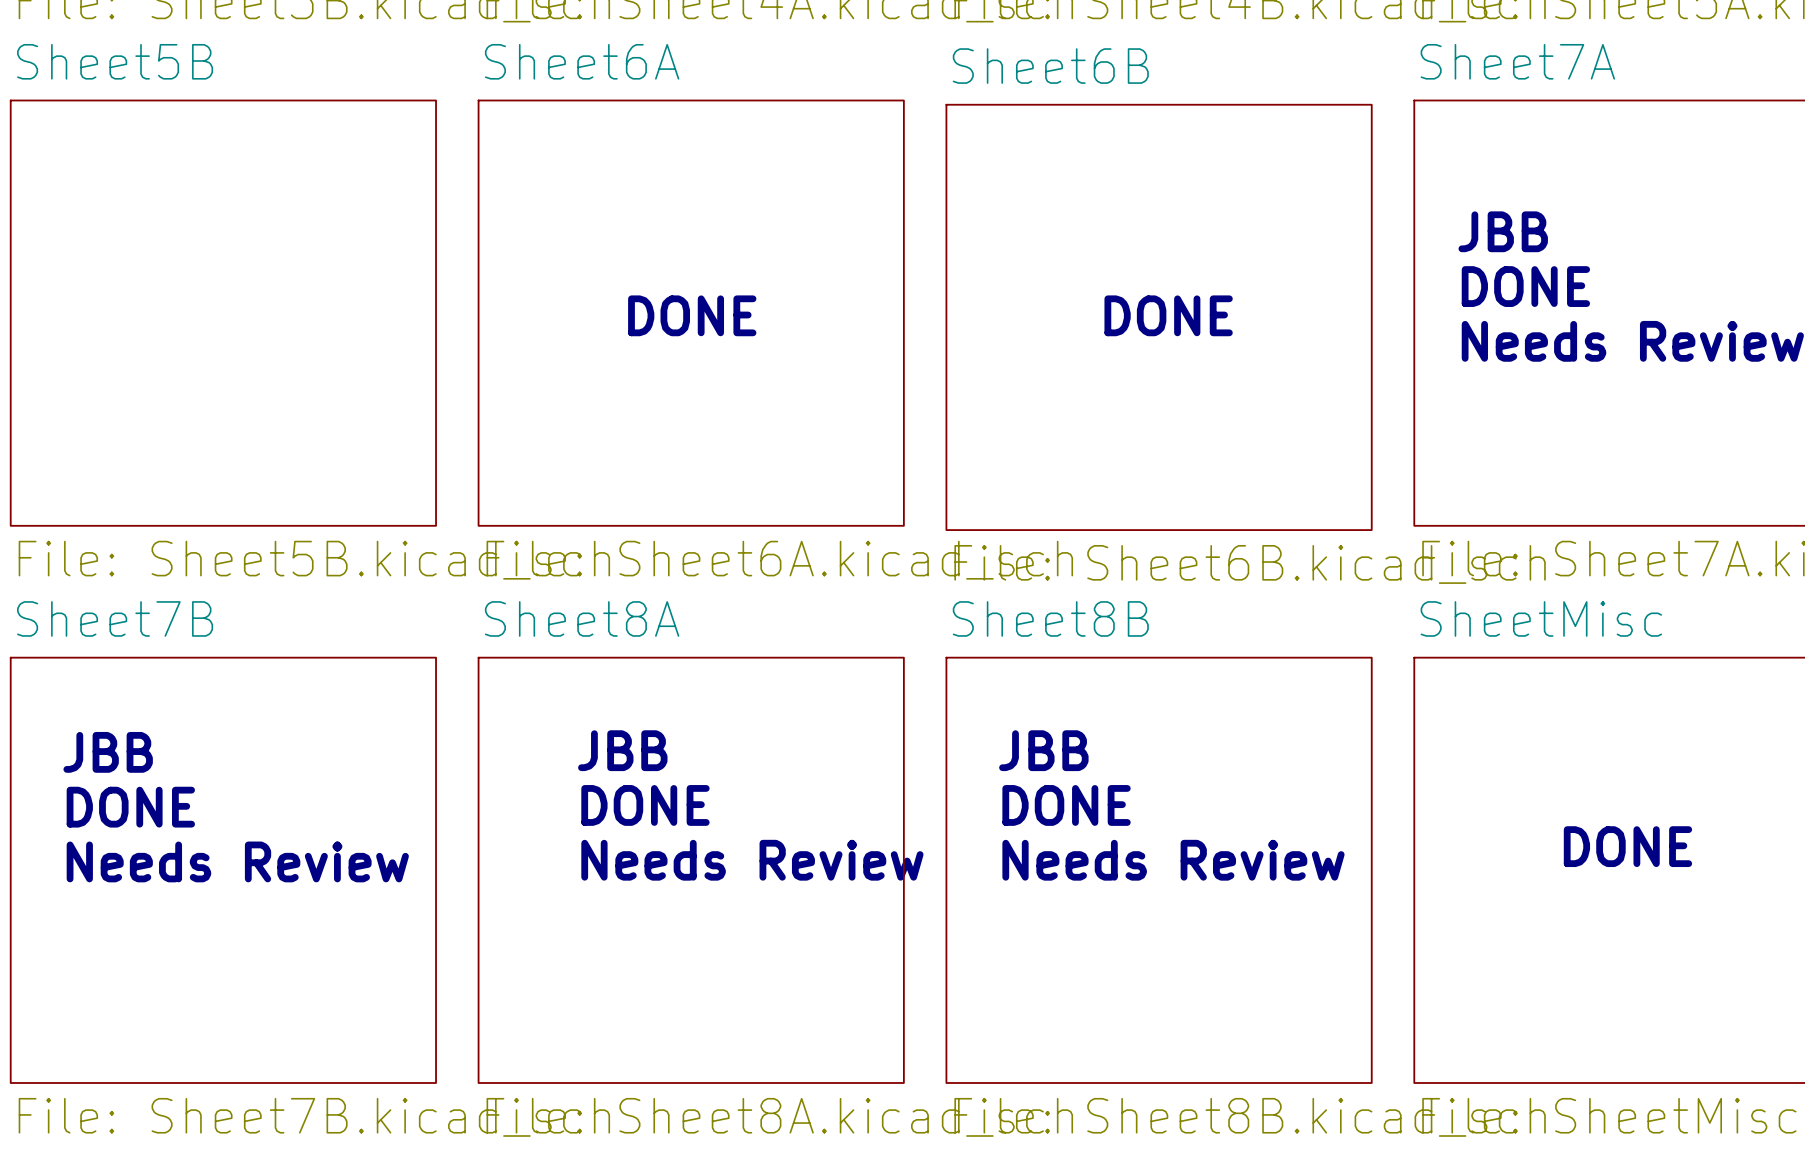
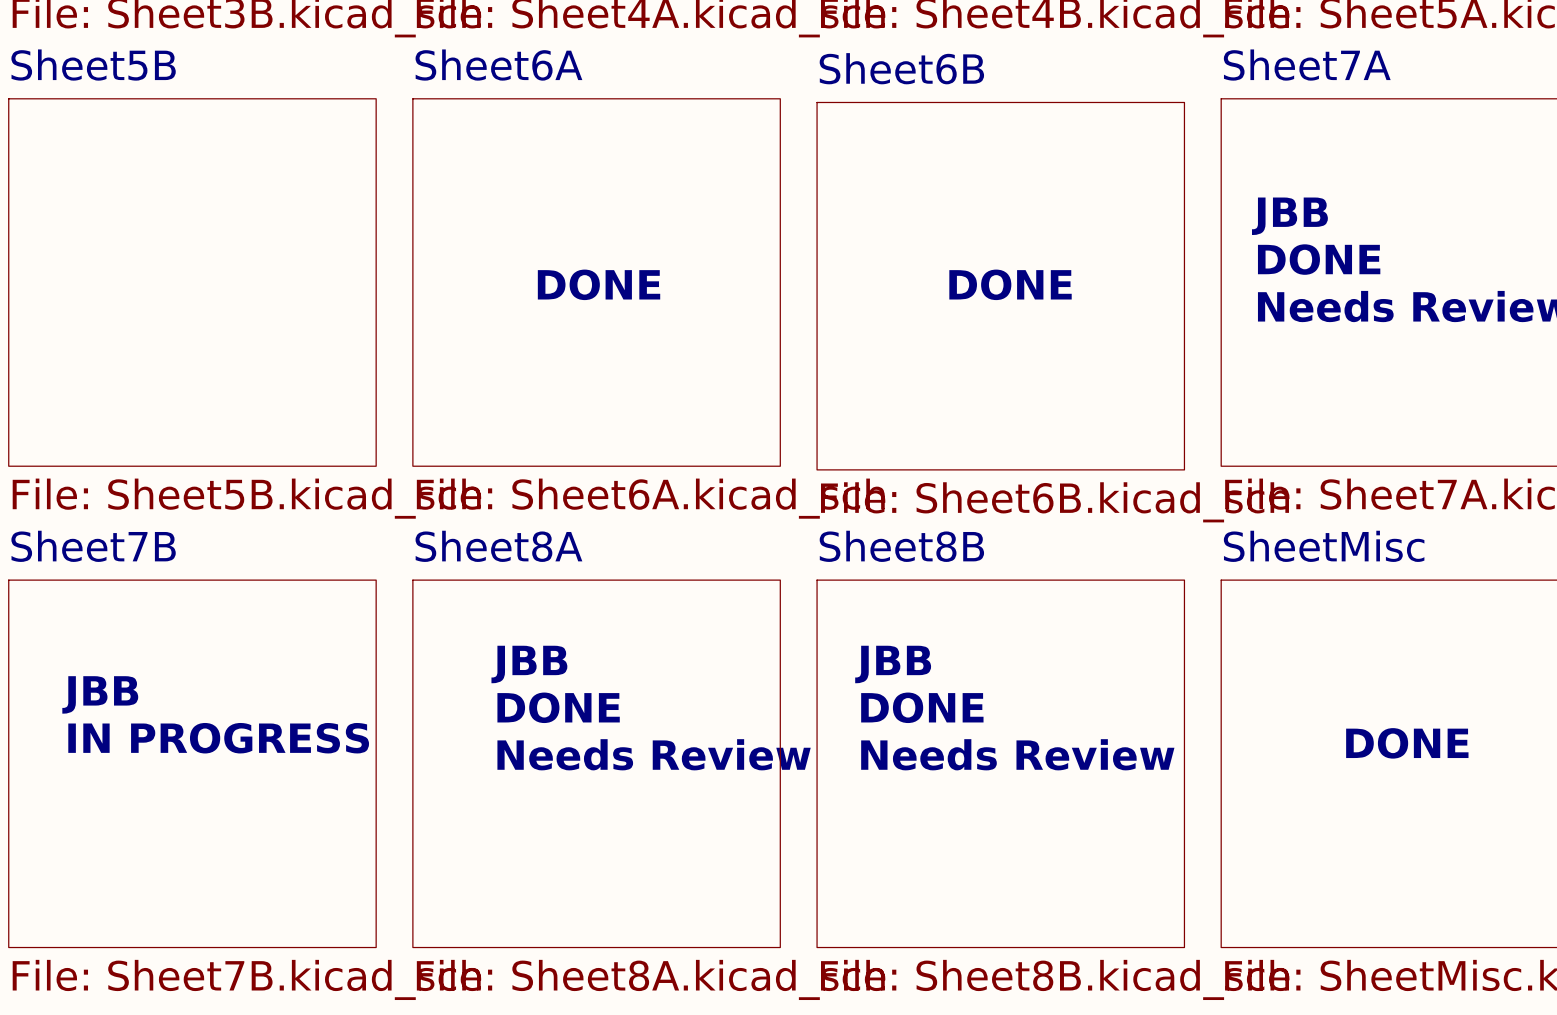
text position: JBB (108, 752) -> JBB (100, 694)
text: DONE (130, 807) -> none
text: none -> IN PROGRESS (218, 738)
text: Needs Review (237, 861) -> none

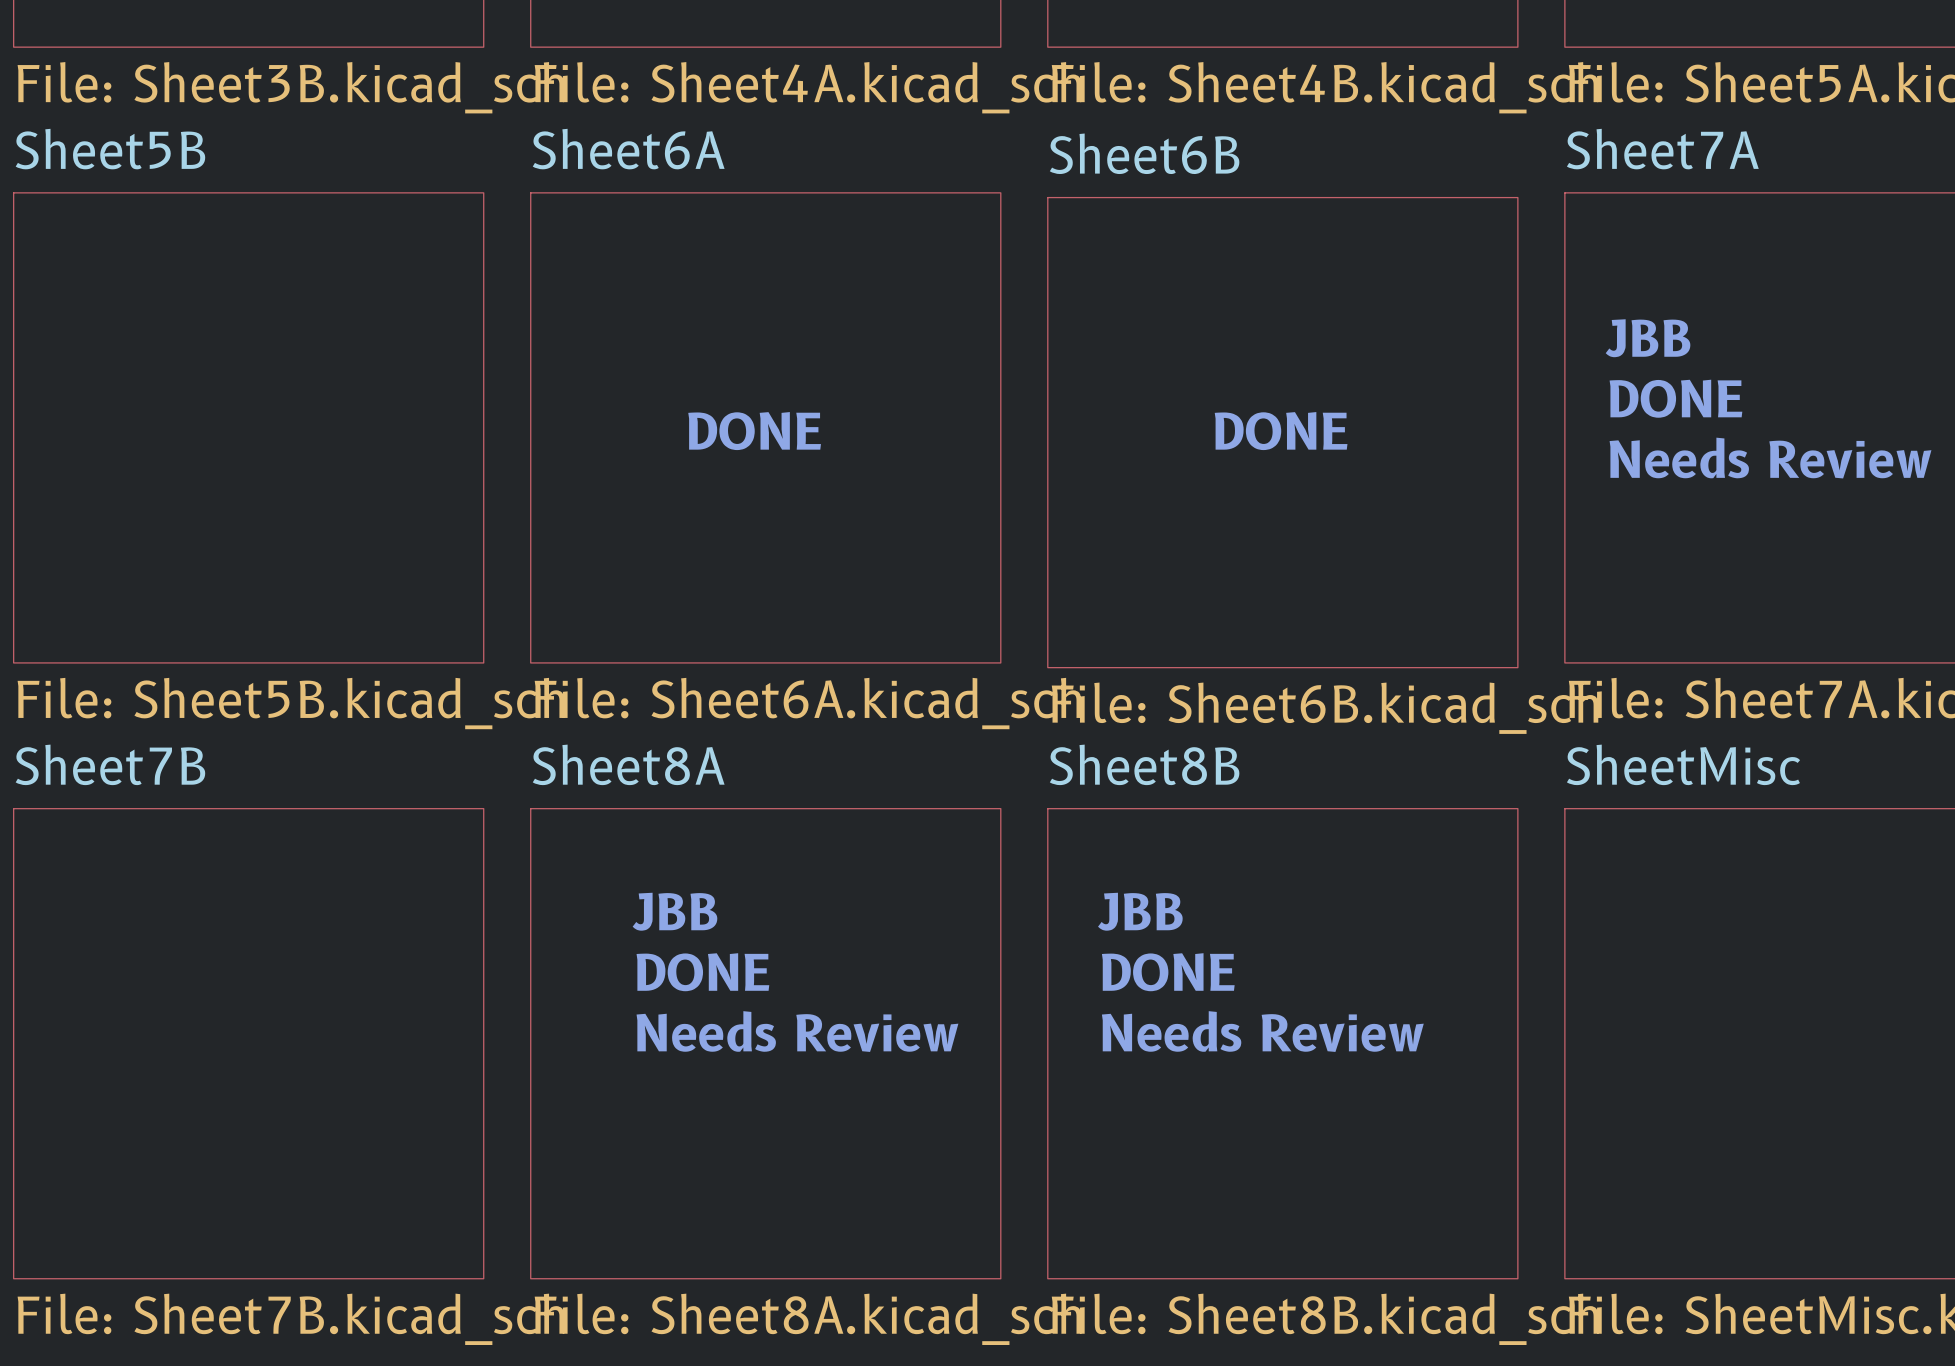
text: JBB (100, 694) -> none
text: IN PROGRESS (218, 738) -> none
text: DONE (1407, 743) -> none

